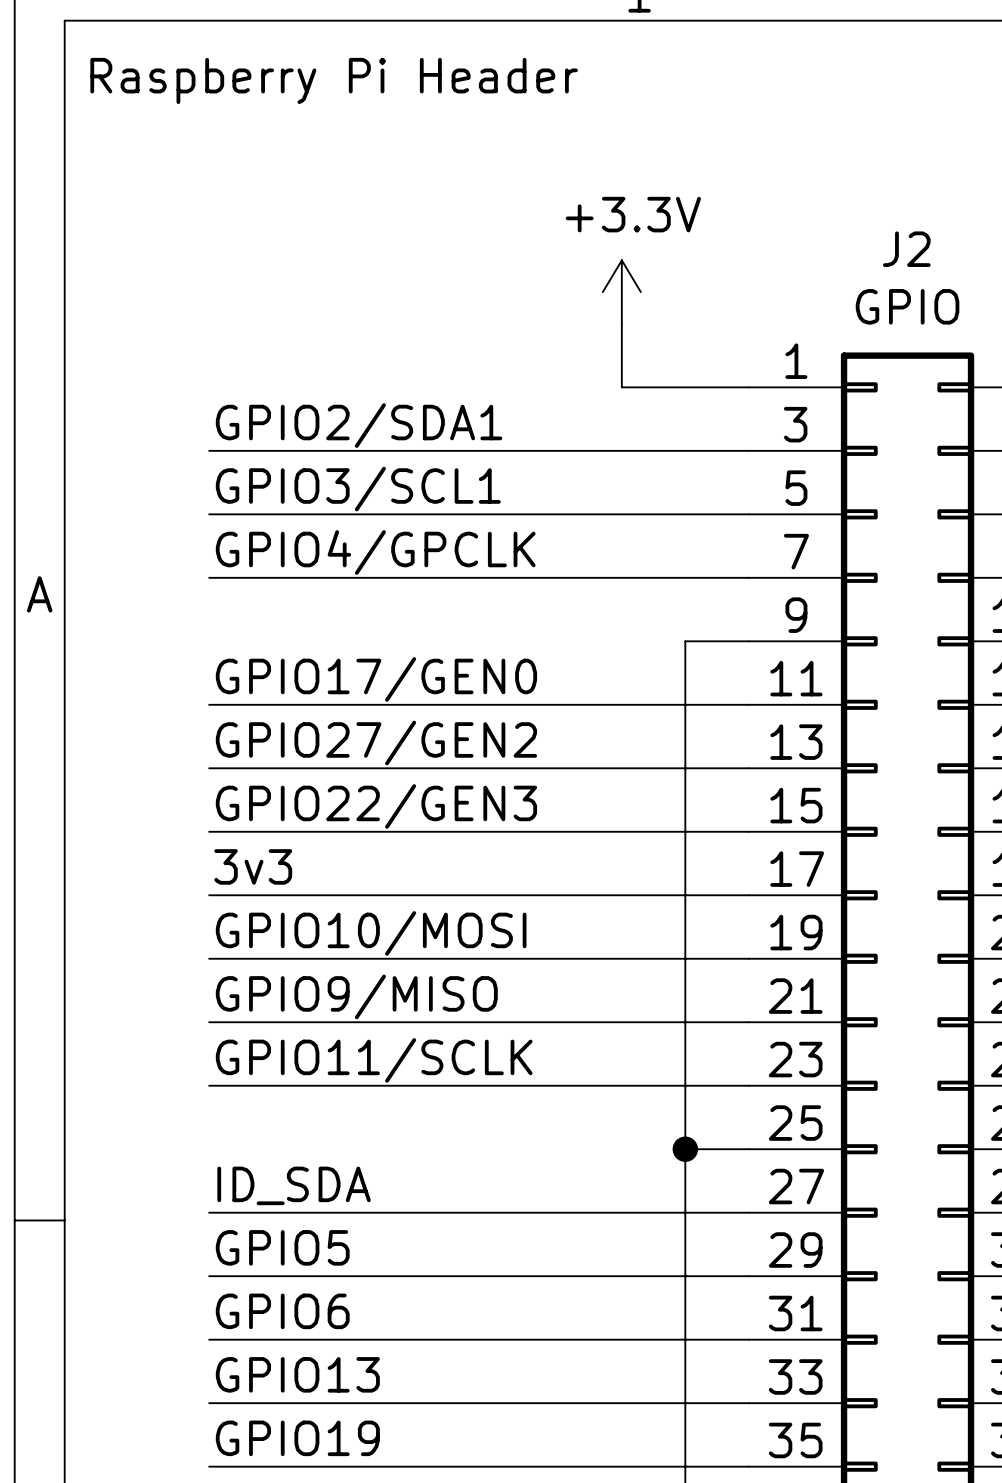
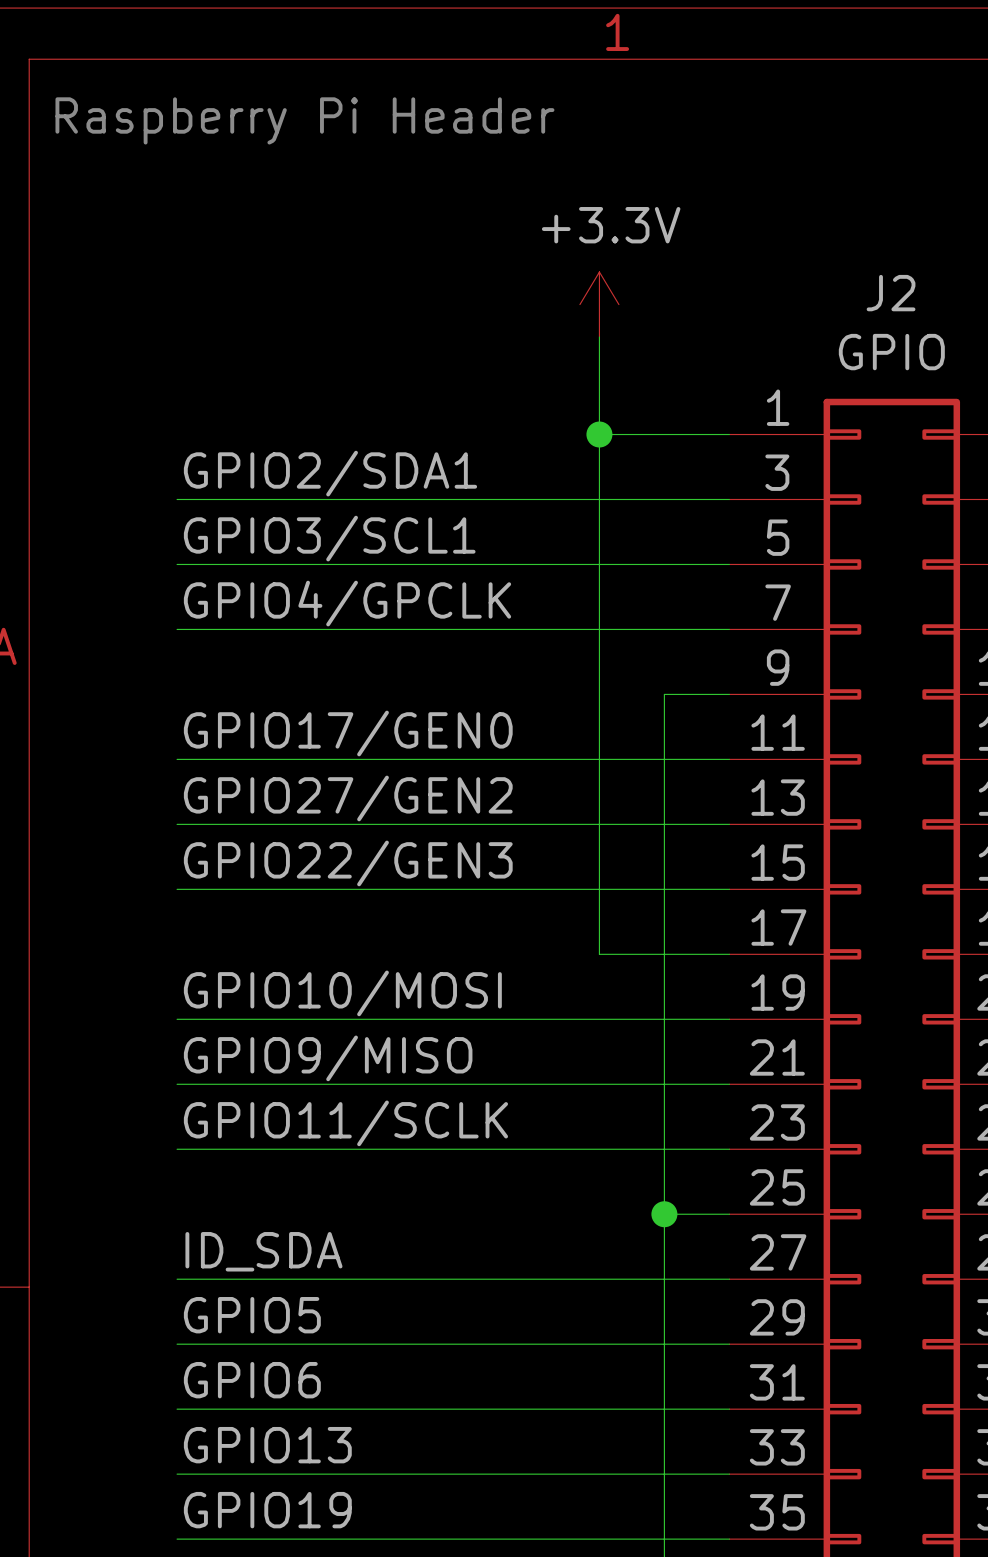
power symbol position: +3.3V (621, 292) -> +3.3V (599, 304)
junction: none -> (599, 434)
label: 3v3 (253, 866) -> none
wire: (209, 895) (621, 895) -> (599, 434) (599, 954)

